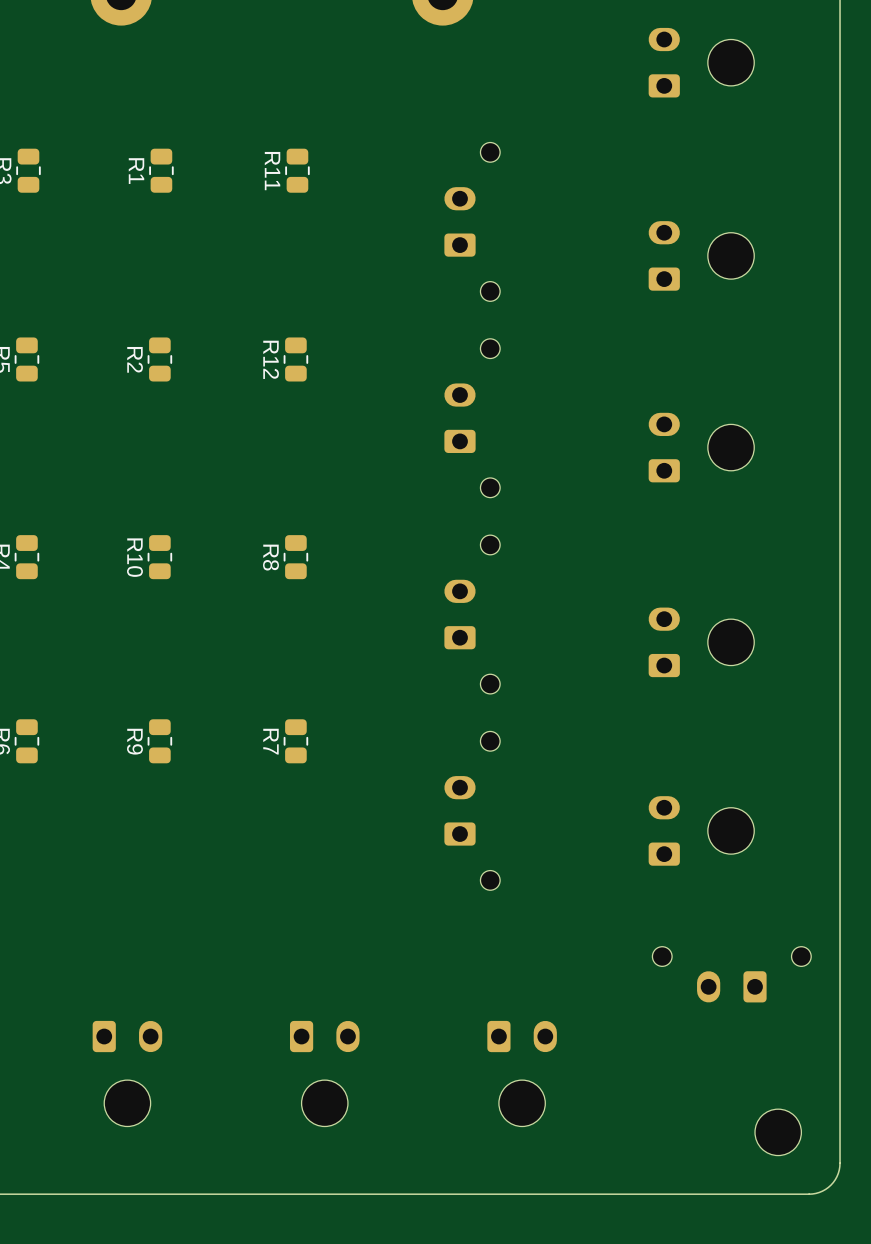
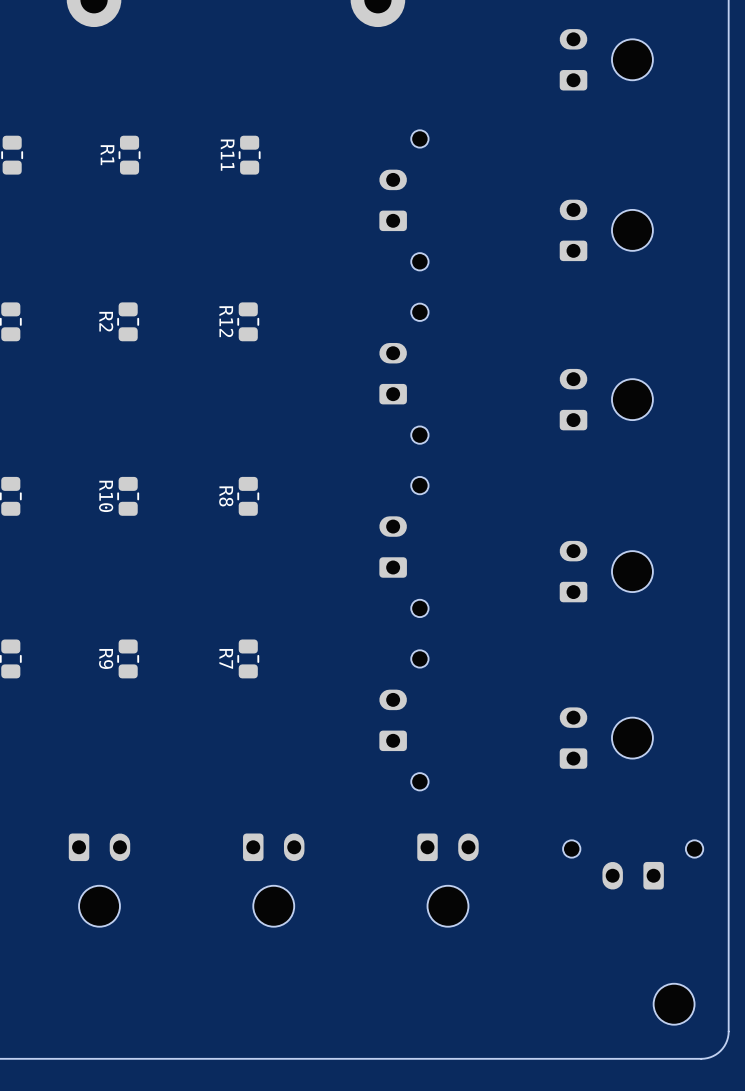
part position: (127, 1073) -> (99, 880)
part position: (324, 1073) -> (273, 880)
part position: (522, 1073) -> (447, 880)

